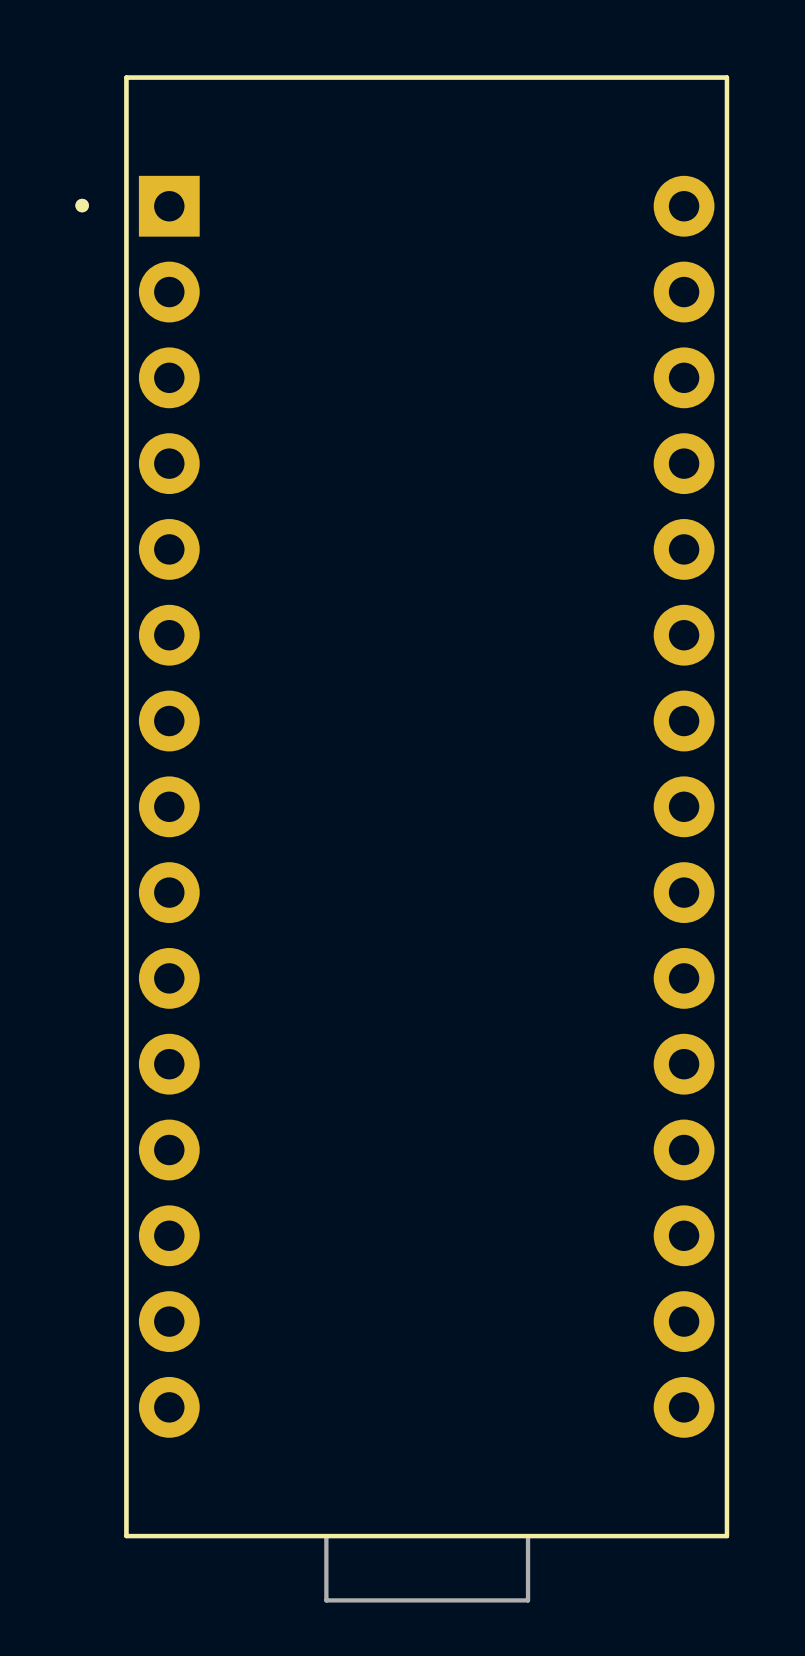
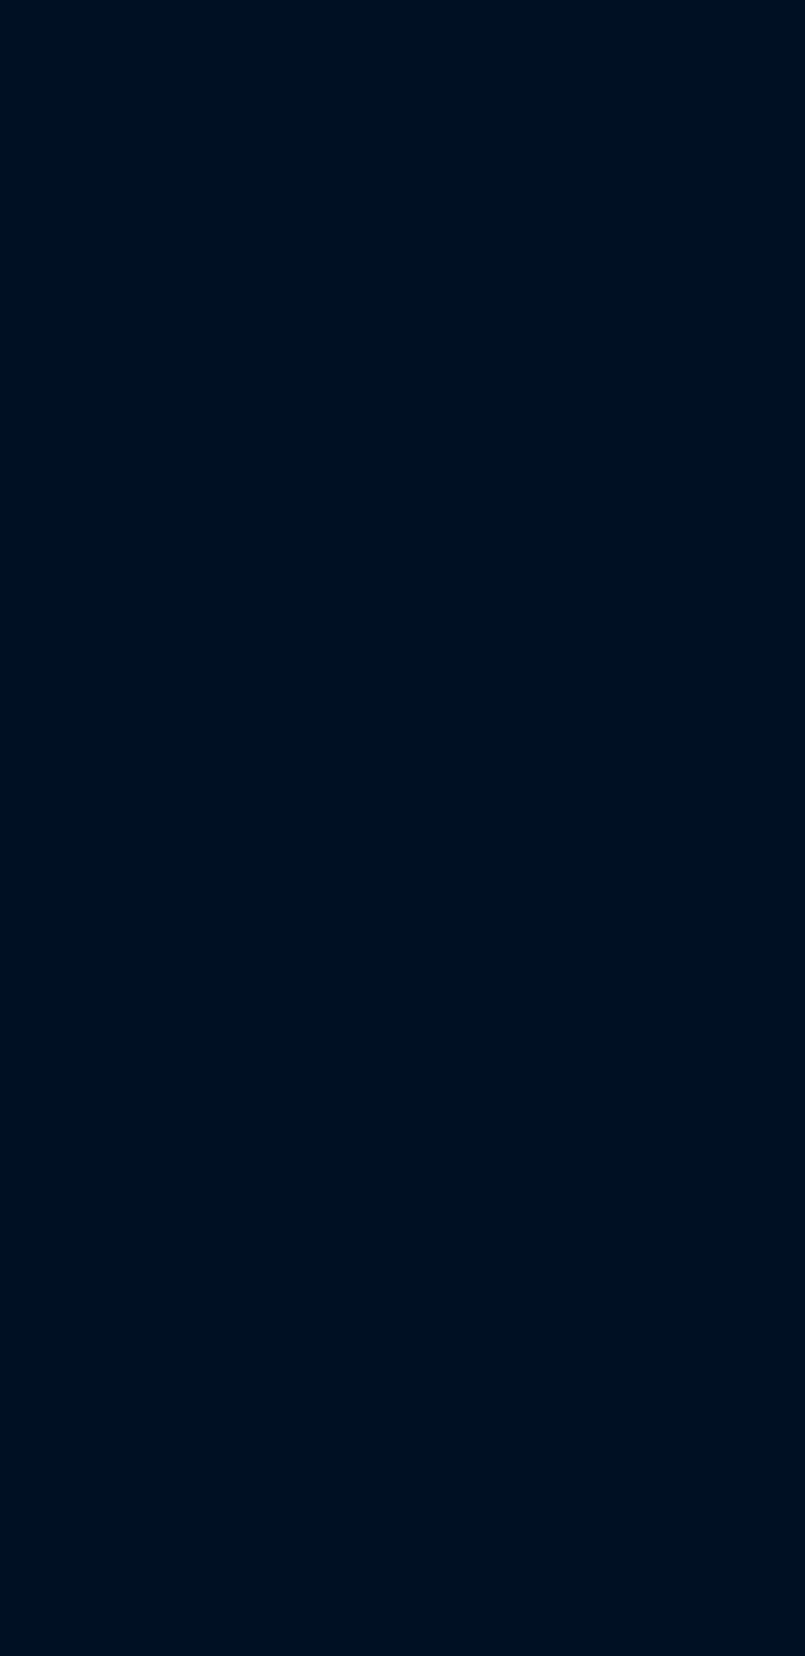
part: (402, 838) -> none

